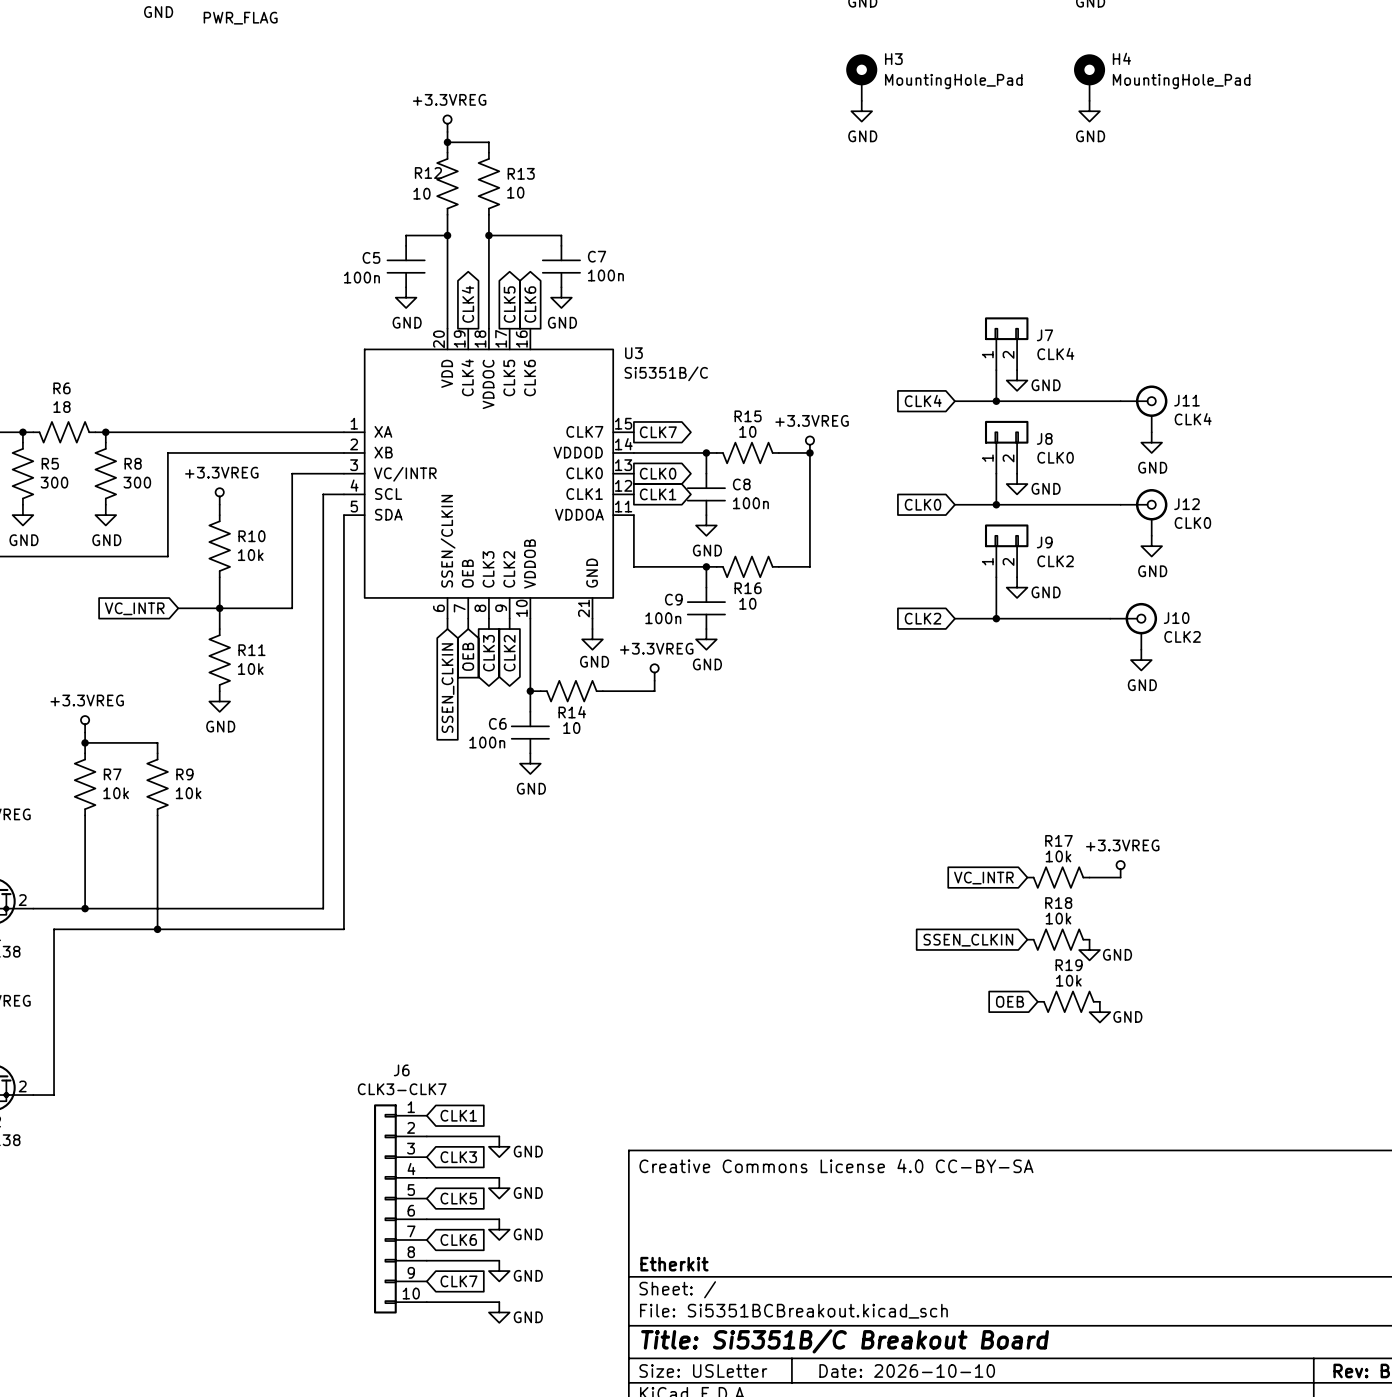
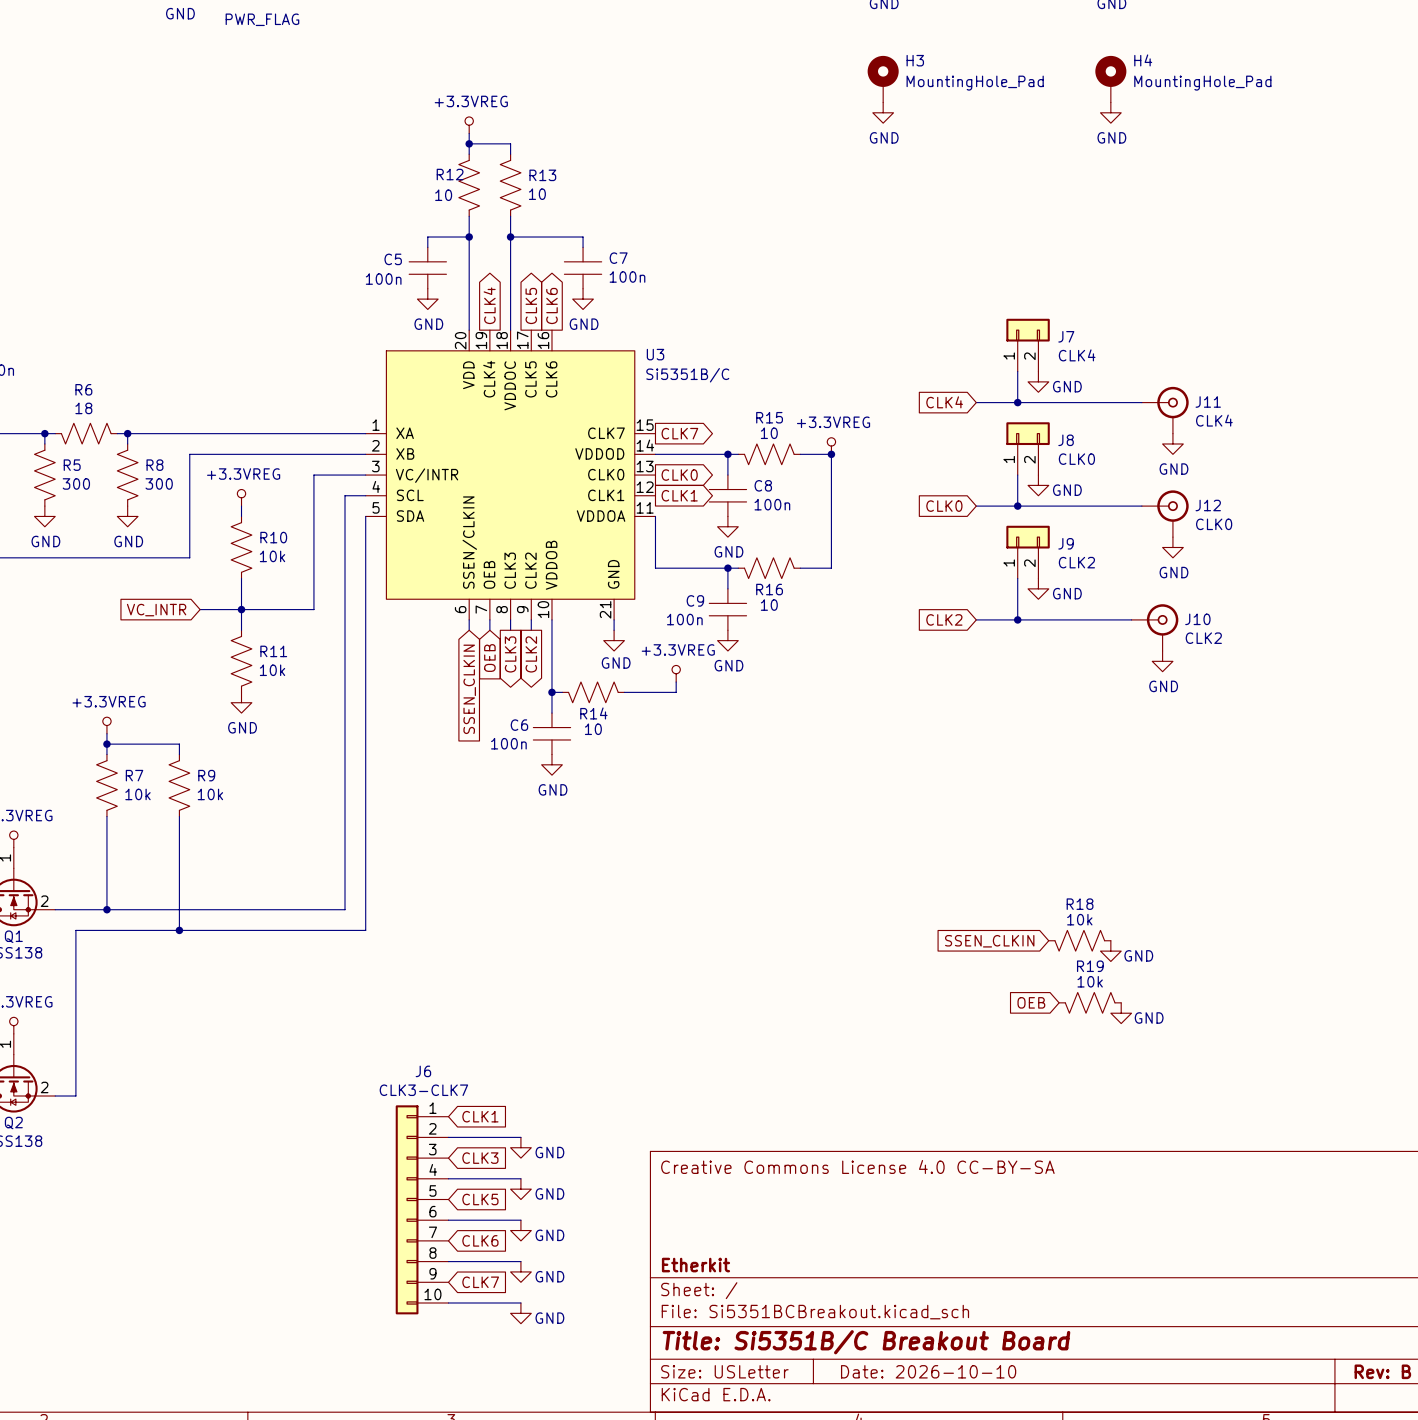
power symbol: +3.3VREG (1120, 869) -> none
R17: 10k (1058, 877) -> none
wire: (1089, 877) (1120, 877) -> none
global label: VC_INTR (983, 878) -> none

